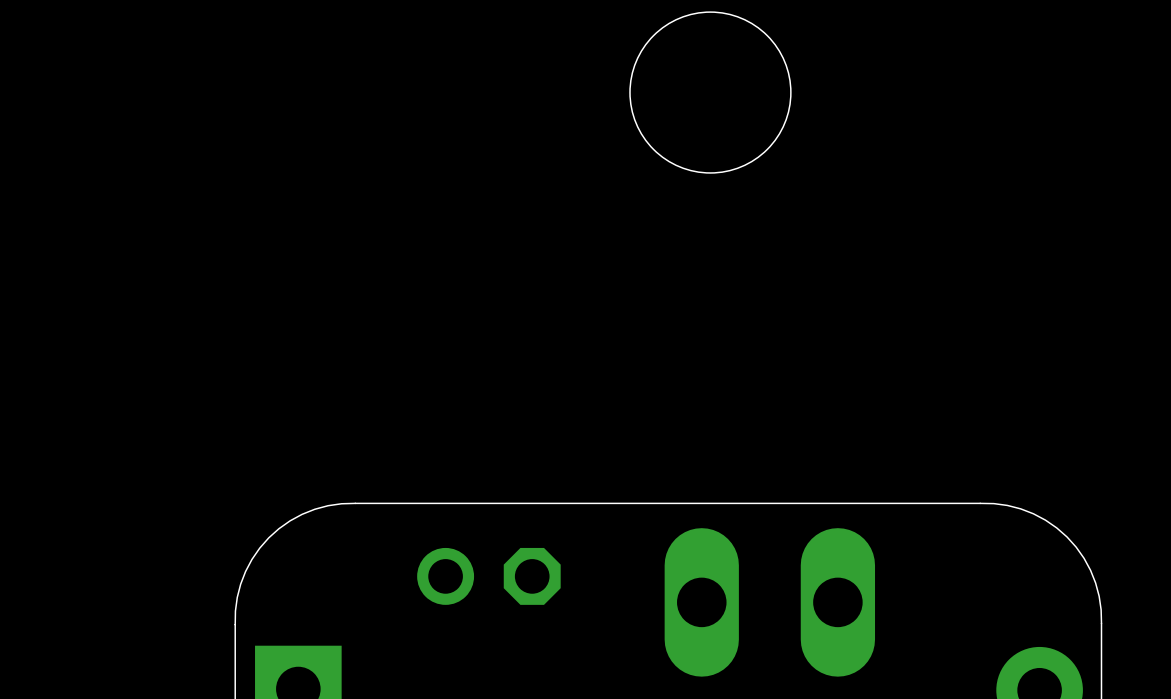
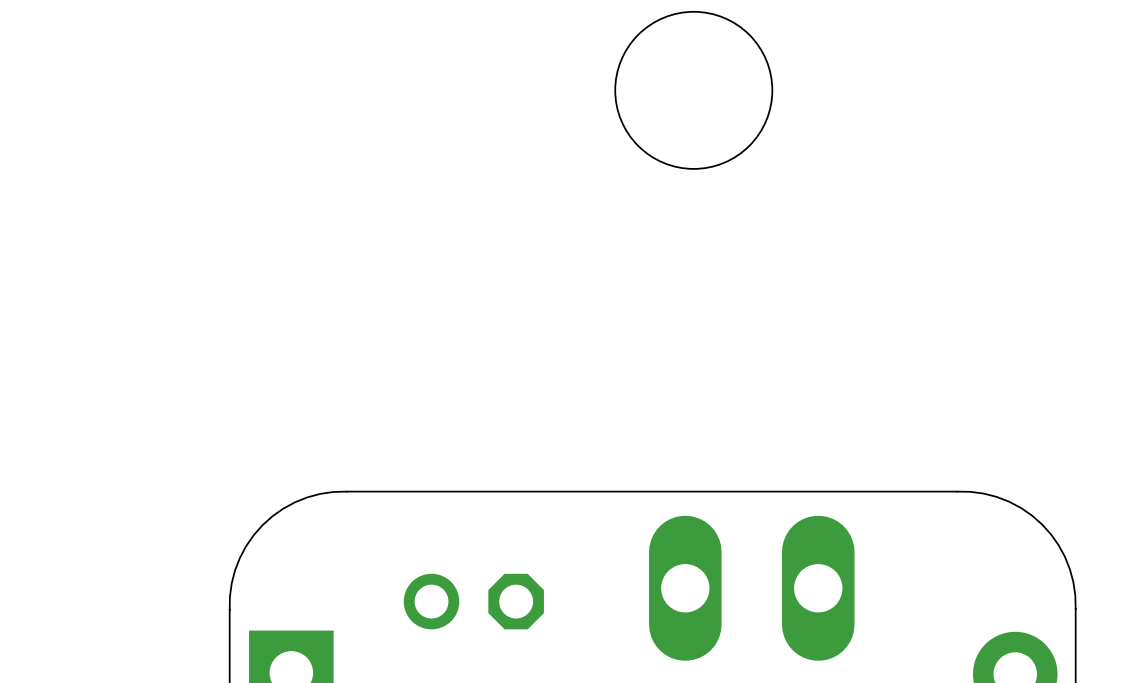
part position: (488, 576) -> (473, 601)

